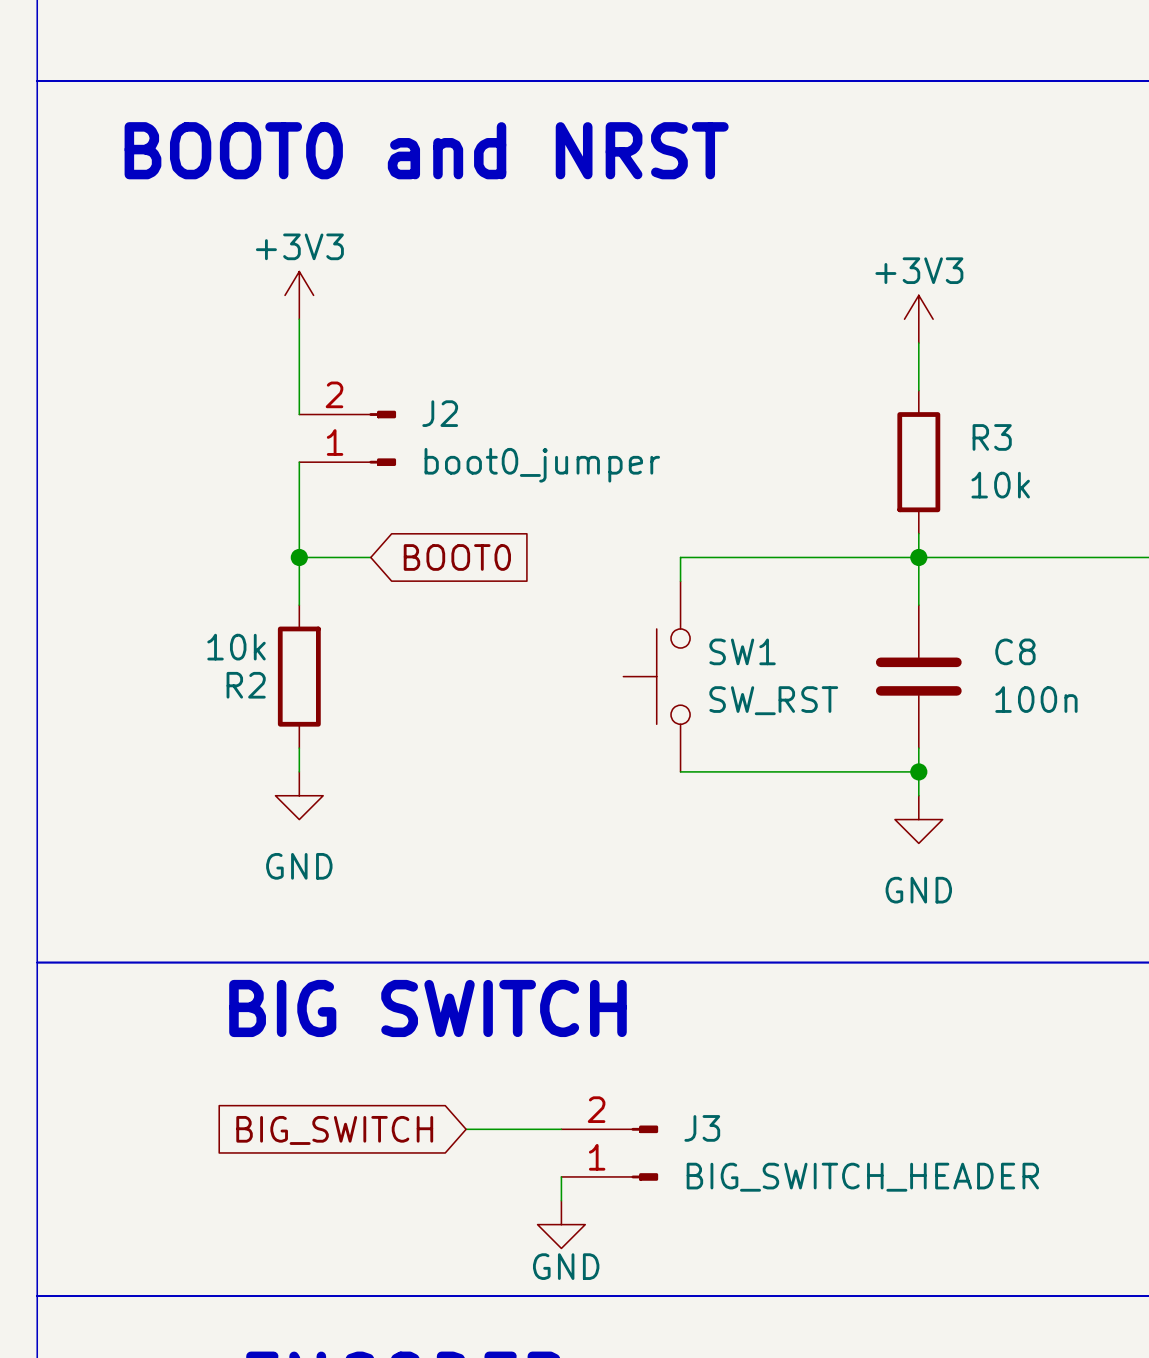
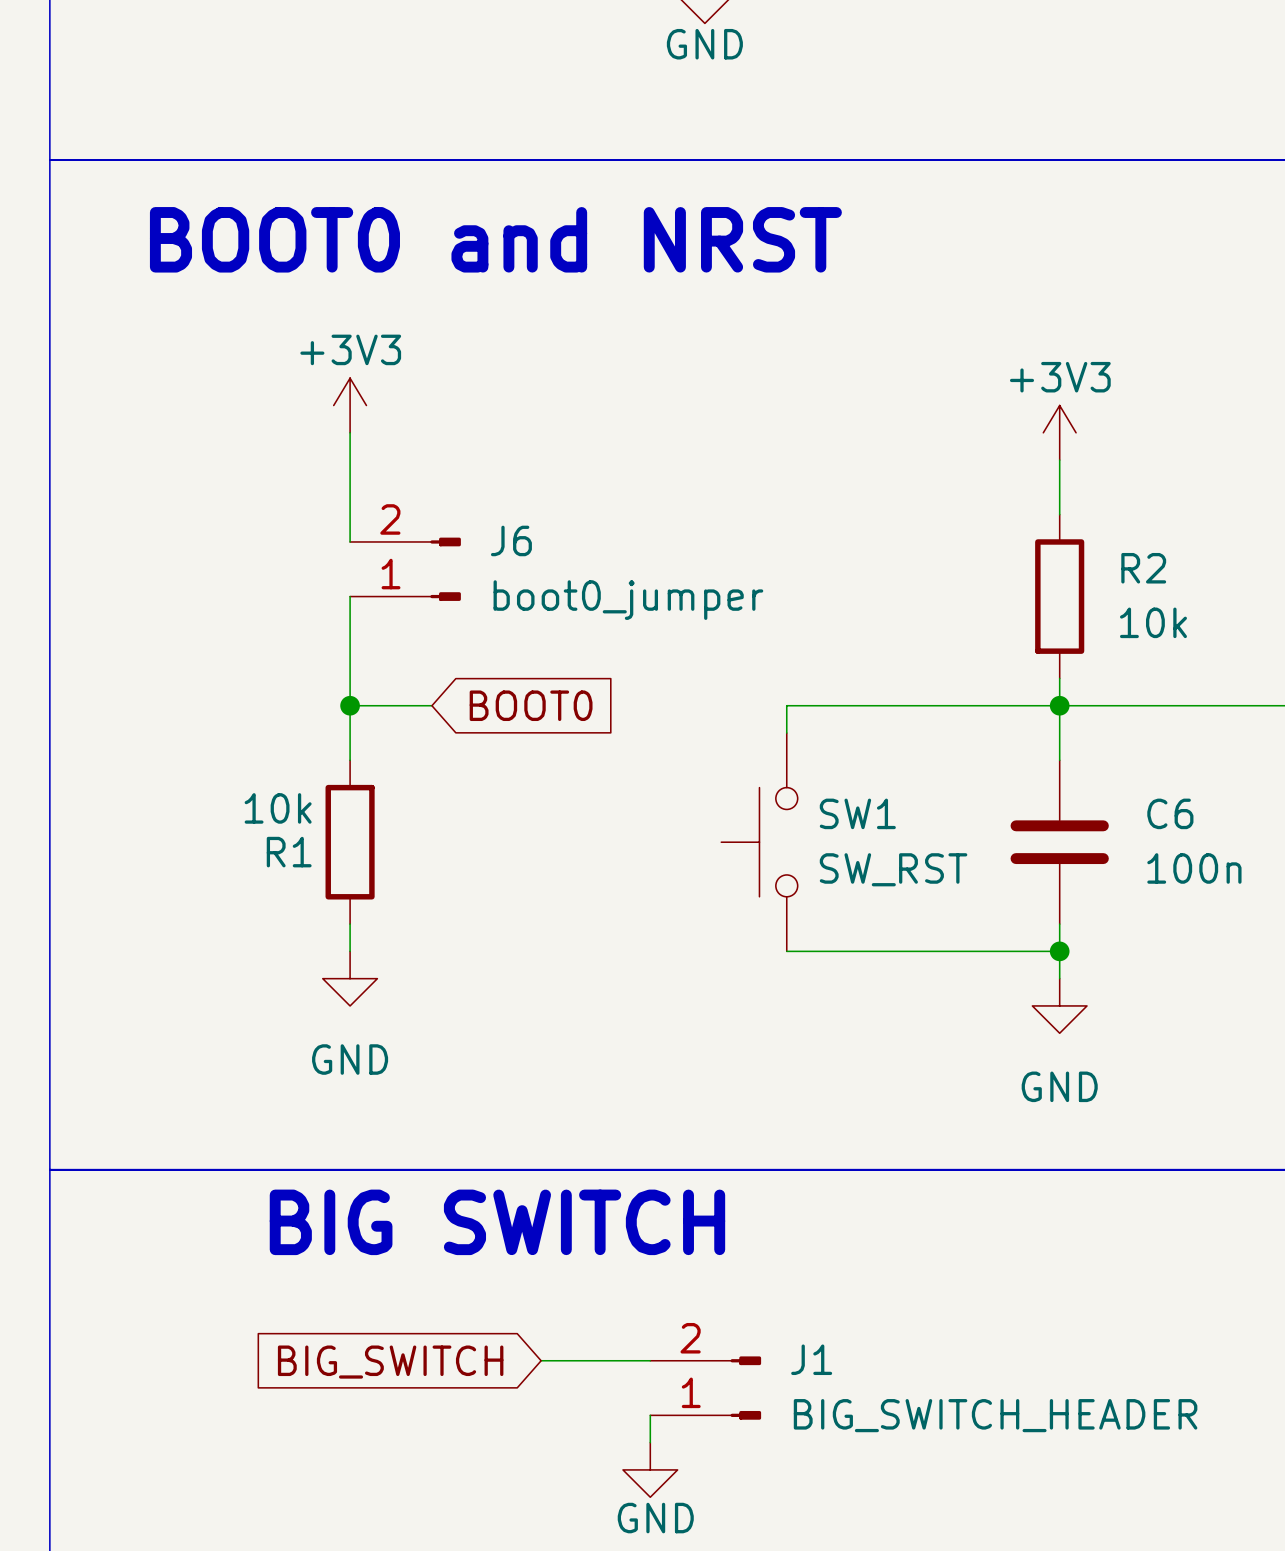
J2 name: J2 (440, 413) -> J6 (511, 540)
R3 name: R3 (992, 437) -> R2 (1143, 568)
C8 name: C8 (1015, 651) -> C6 (1170, 813)
R2 name: R2 (246, 685) -> R1 (289, 852)
J3 name: J3 (702, 1128) -> J1 (811, 1359)

